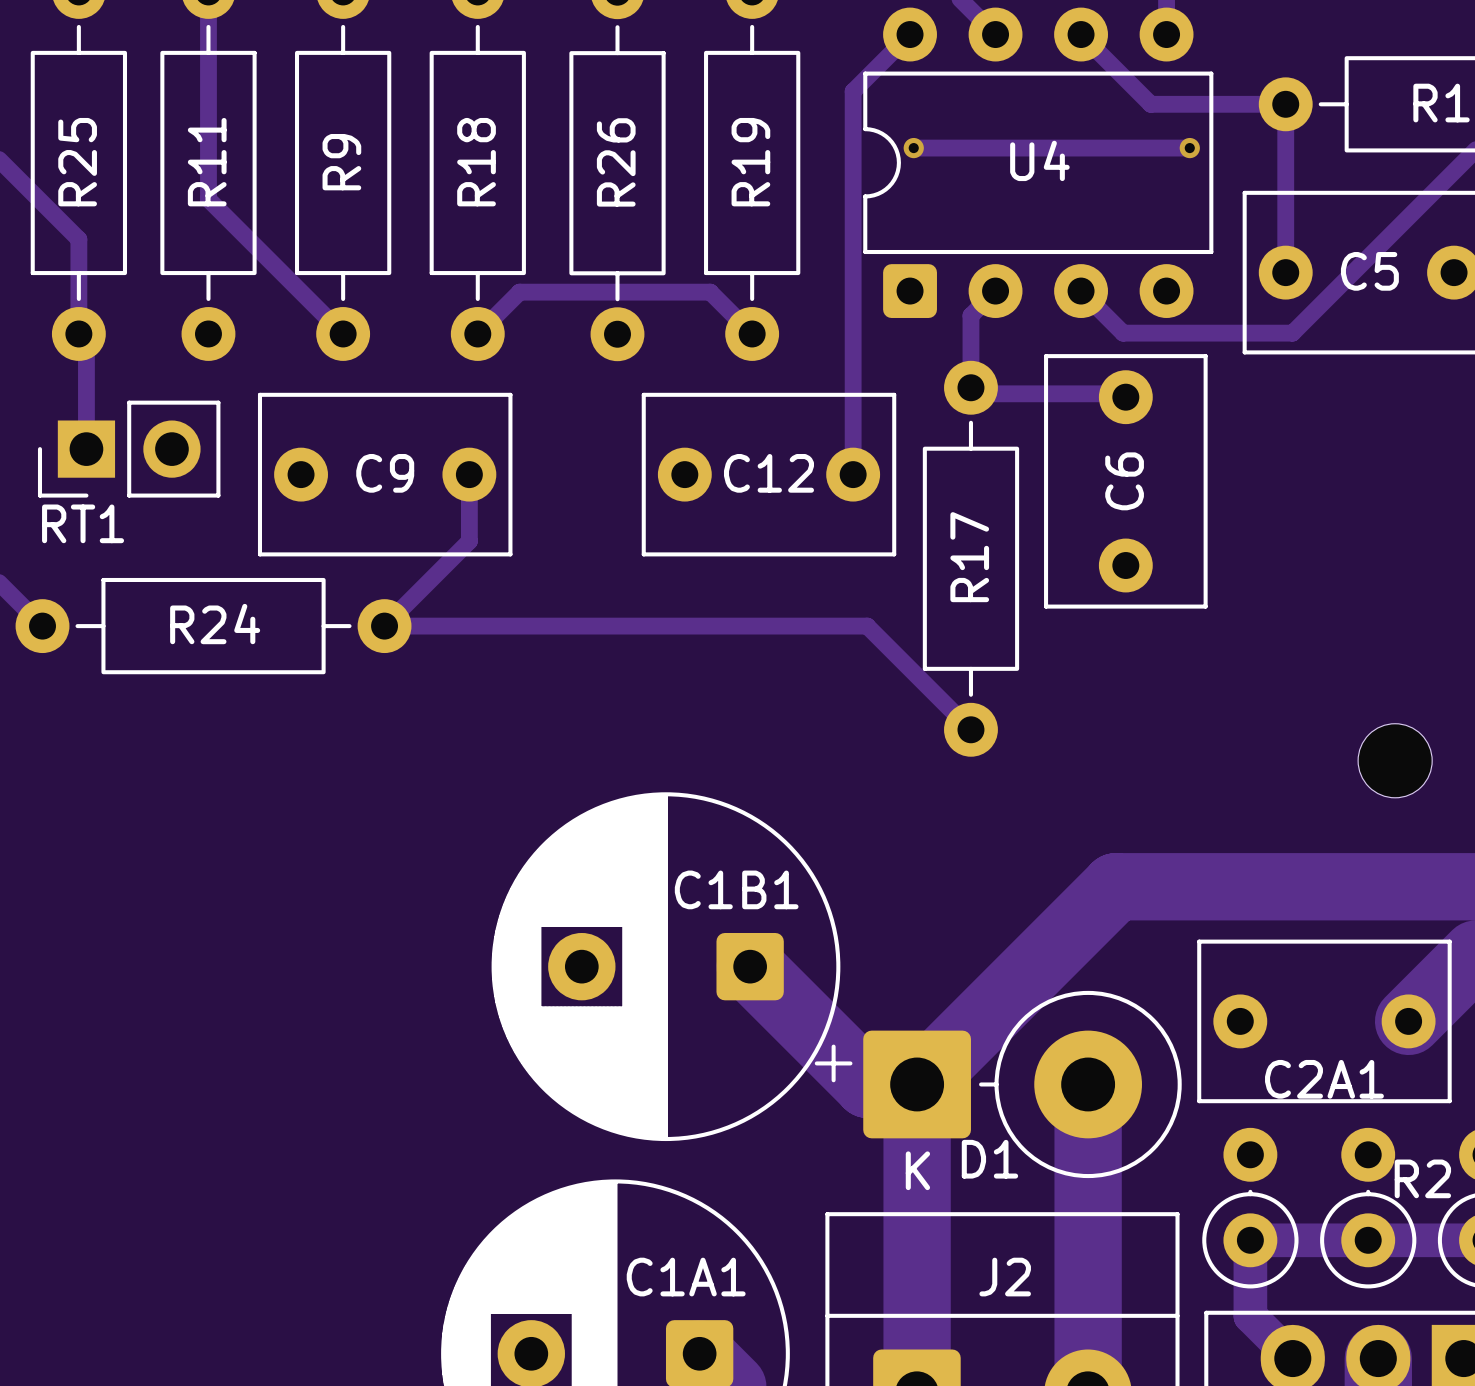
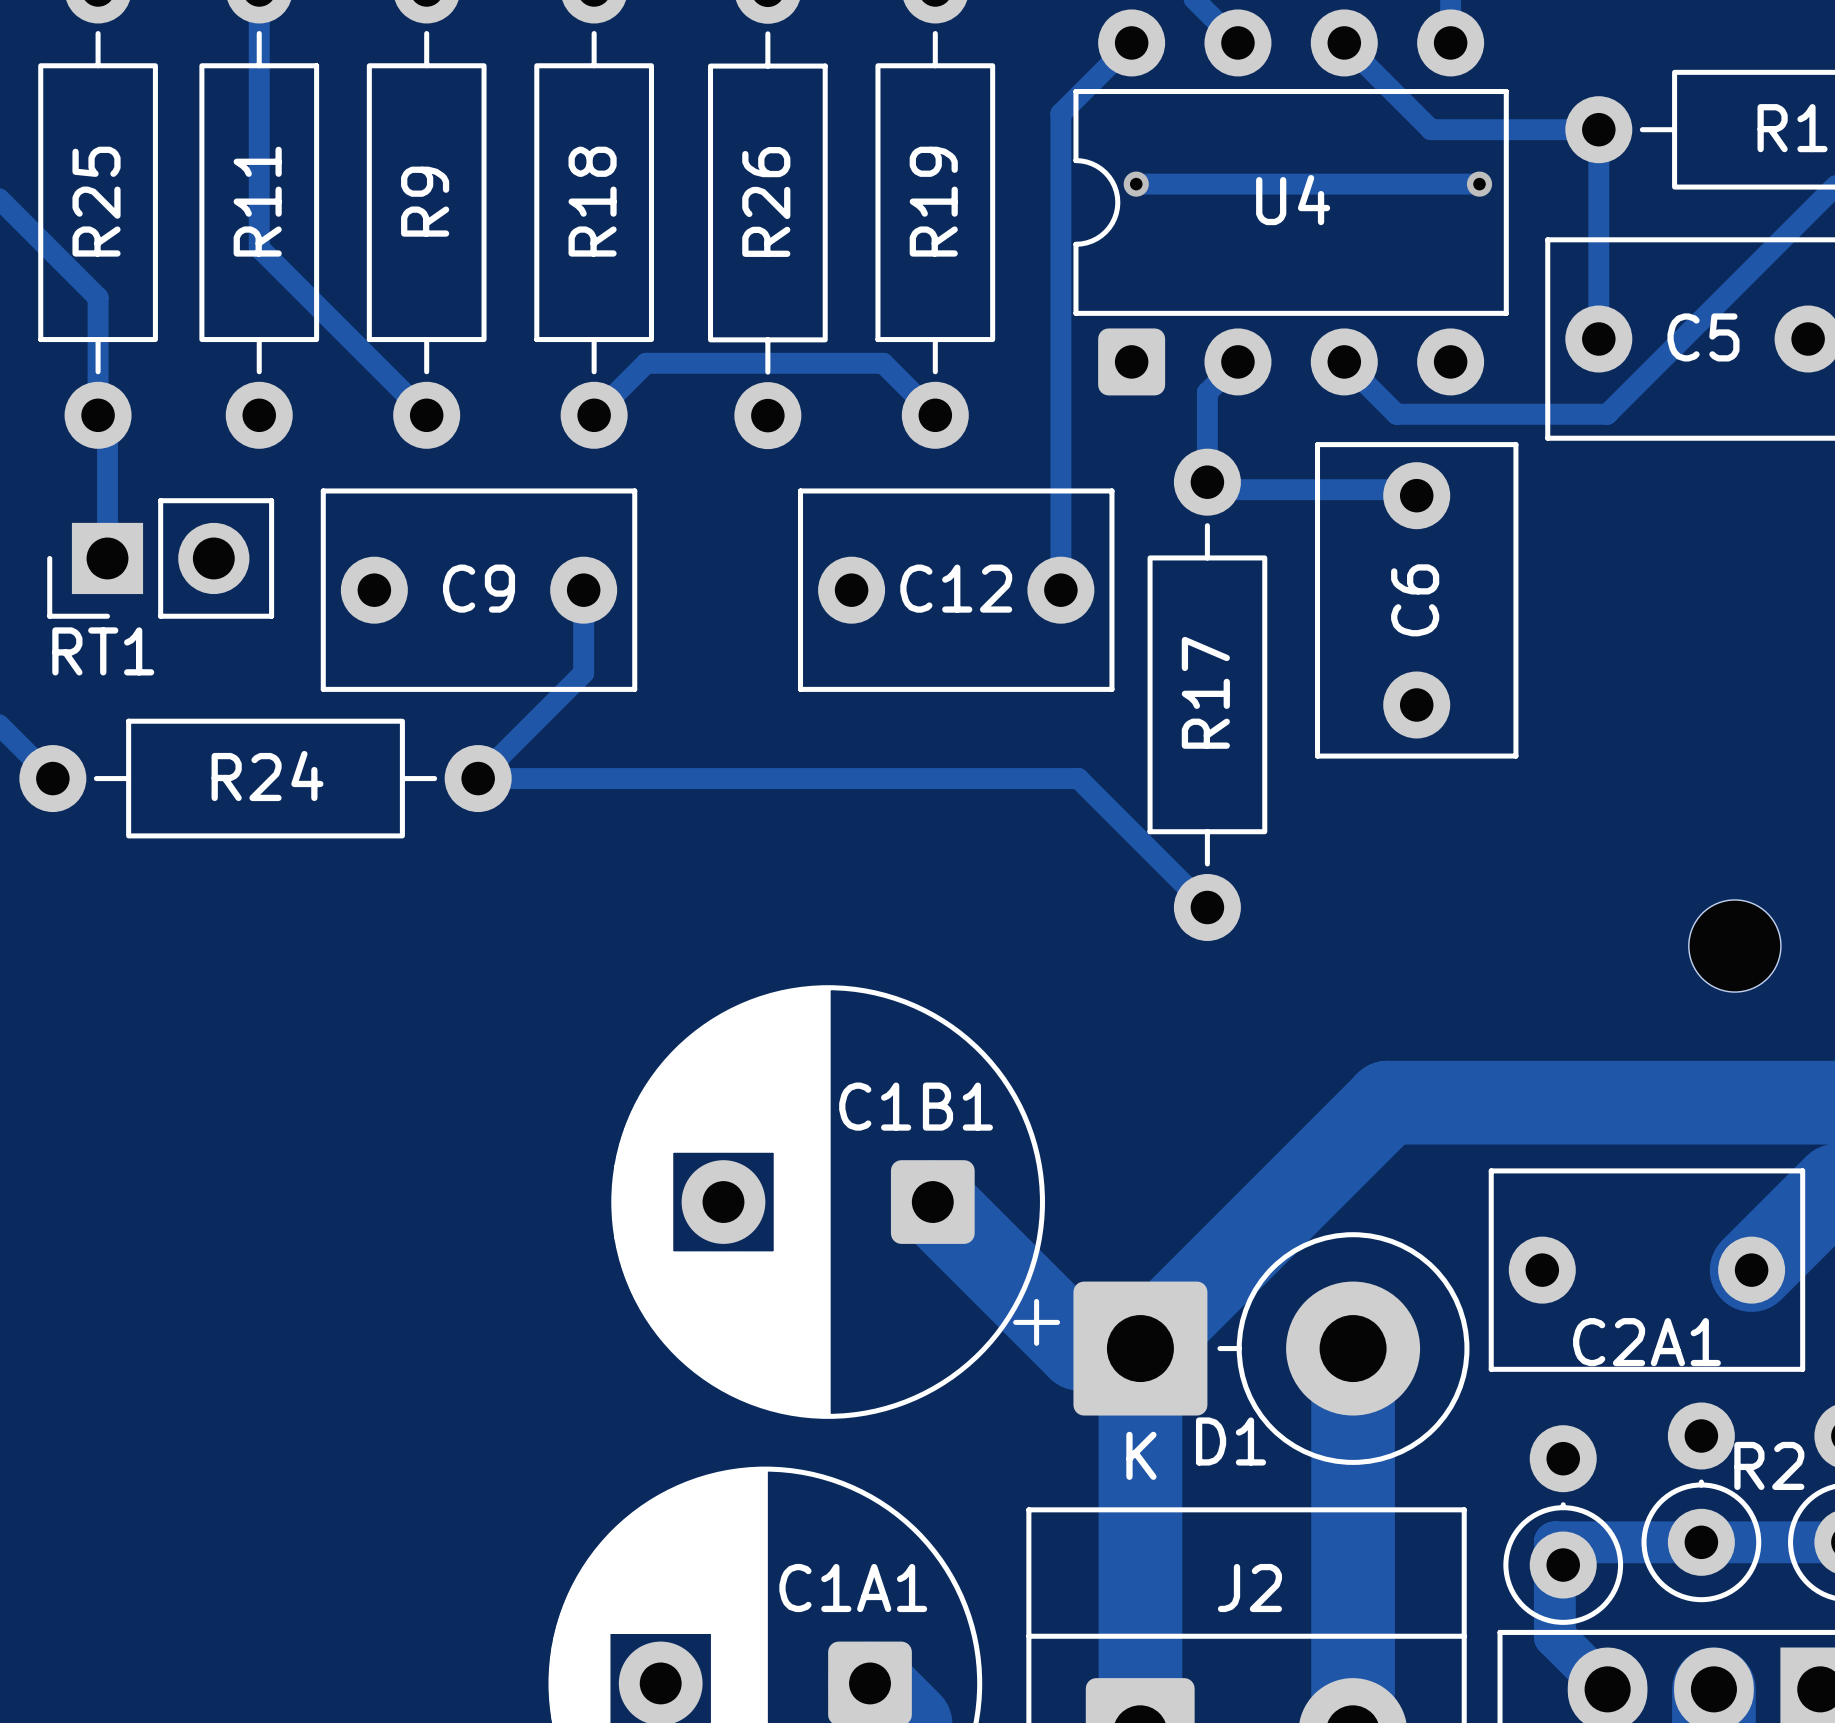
C6 position: (1125, 481) -> (1416, 600)
part position: (1250, 1208) -> (1563, 1525)

